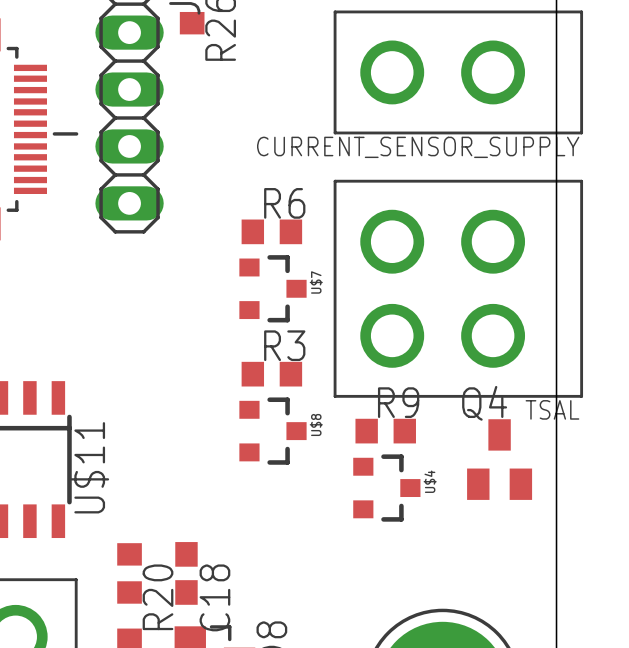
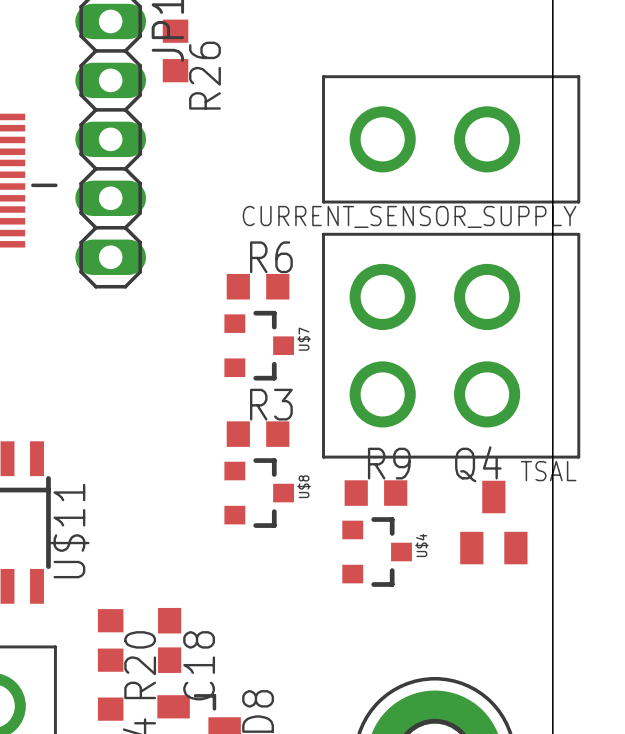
CURRENT_SENSOR_SUPPLY position: (458, 72) -> (451, 139)

